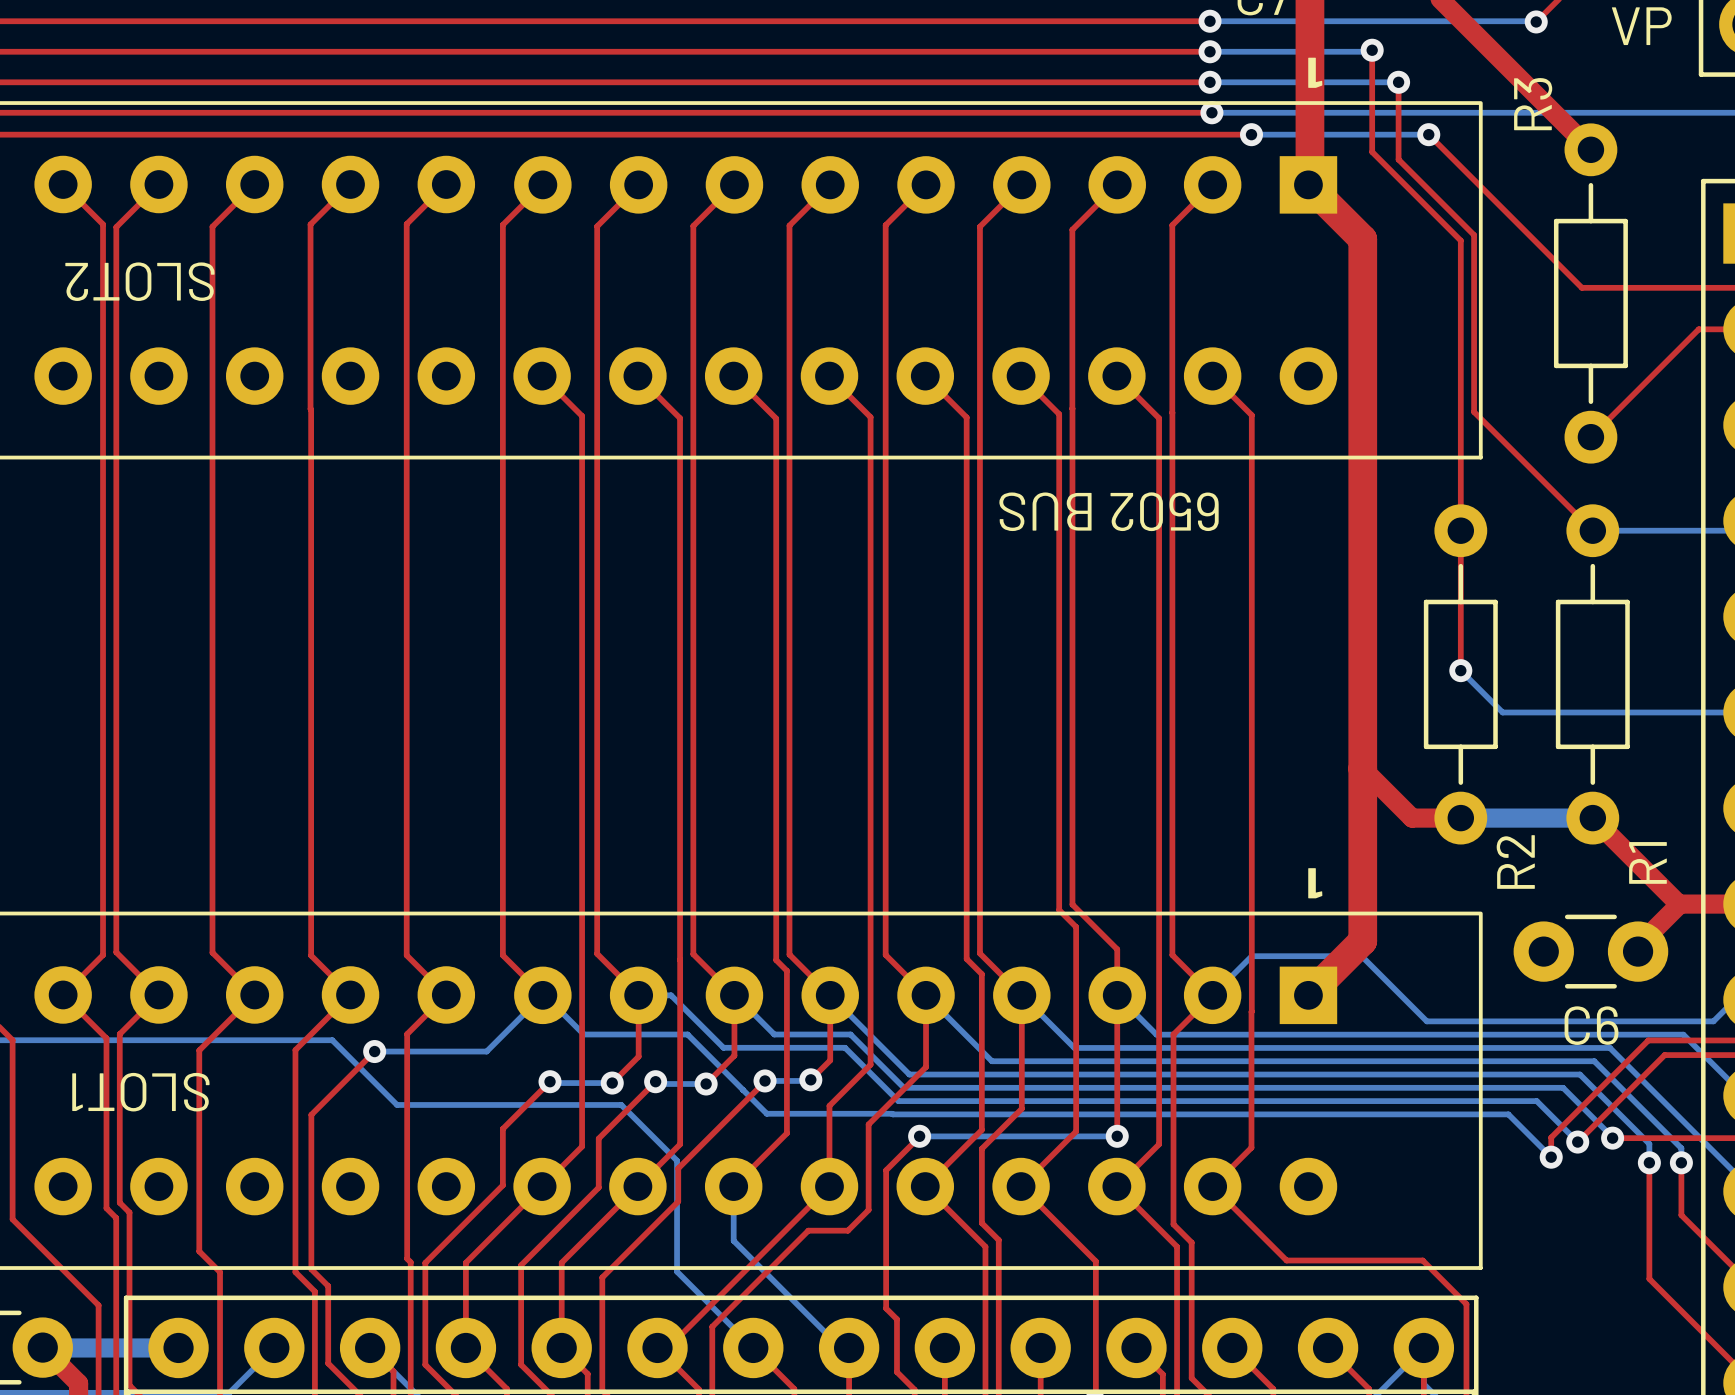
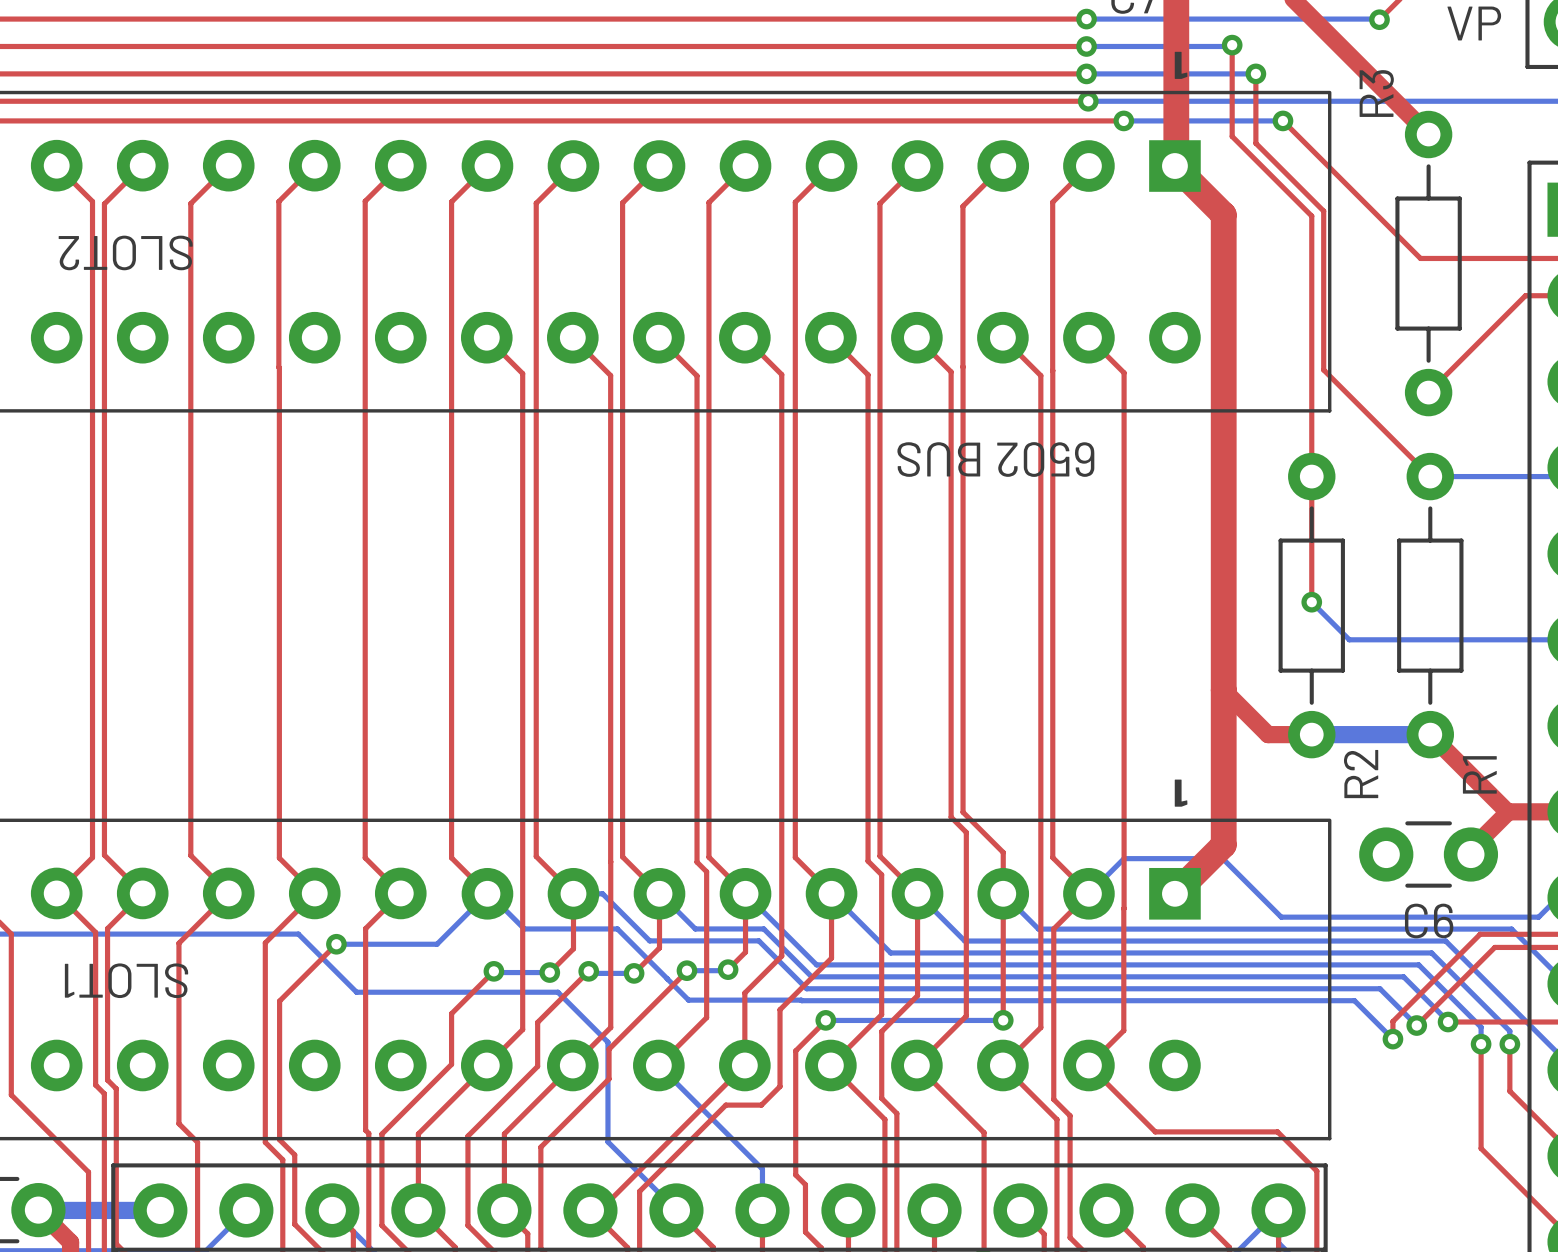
bottom track: (733, 1186) (733, 1240) (840, 1347) (849, 1347) -> (658, 1065) (762, 1169) (762, 1210)

